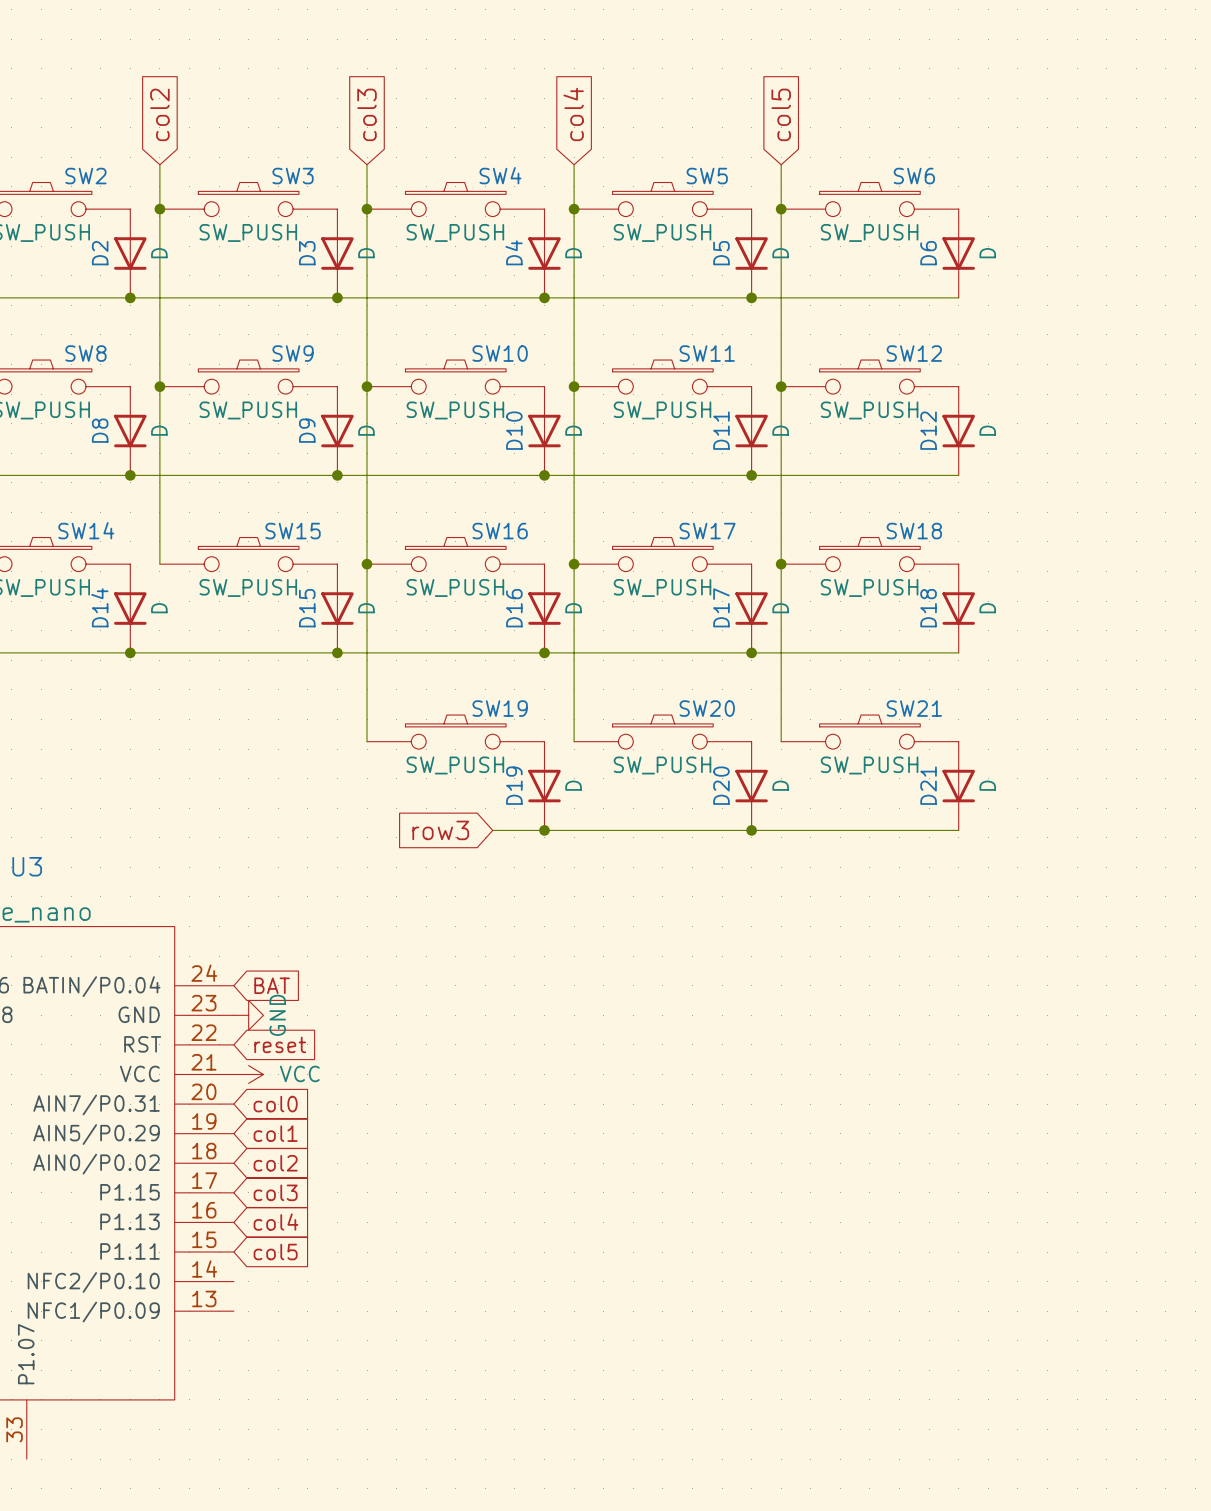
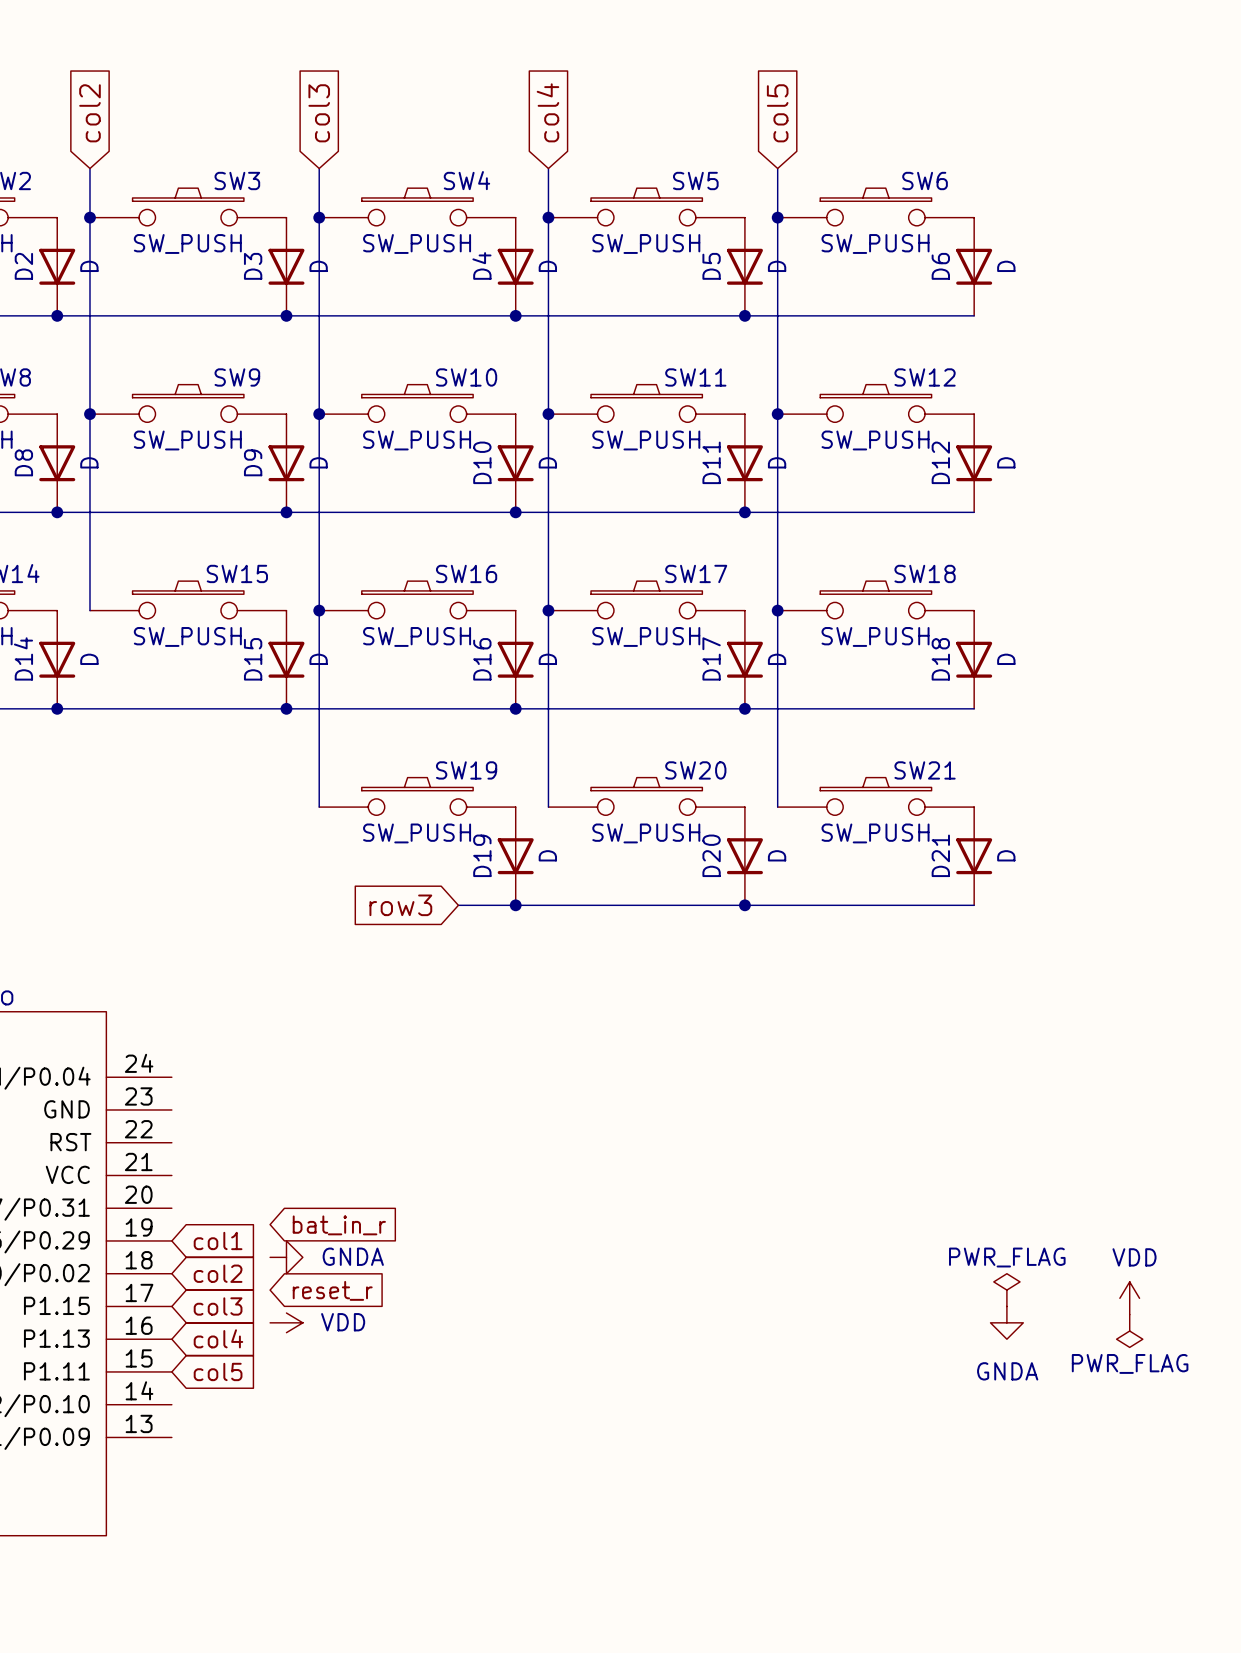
global label: BAT (272, 985) -> none
power symbol: GND (248, 1015) -> none
global label: reset (280, 1044) -> none
power symbol: VCC (248, 1074) -> none
global label: col0 (275, 1104) -> none
global label: none -> bat_in_r (339, 1225)
power symbol: none -> GNDA (286, 1257)
global label: none -> reset_r (332, 1290)
power symbol: none -> PWR_FLAG (1006, 1290)
power symbol: none -> VDD (1129, 1298)
power symbol: none -> VDD (286, 1322)
power symbol: none -> GNDA (1006, 1322)
power symbol: none -> PWR_FLAG (1129, 1331)

